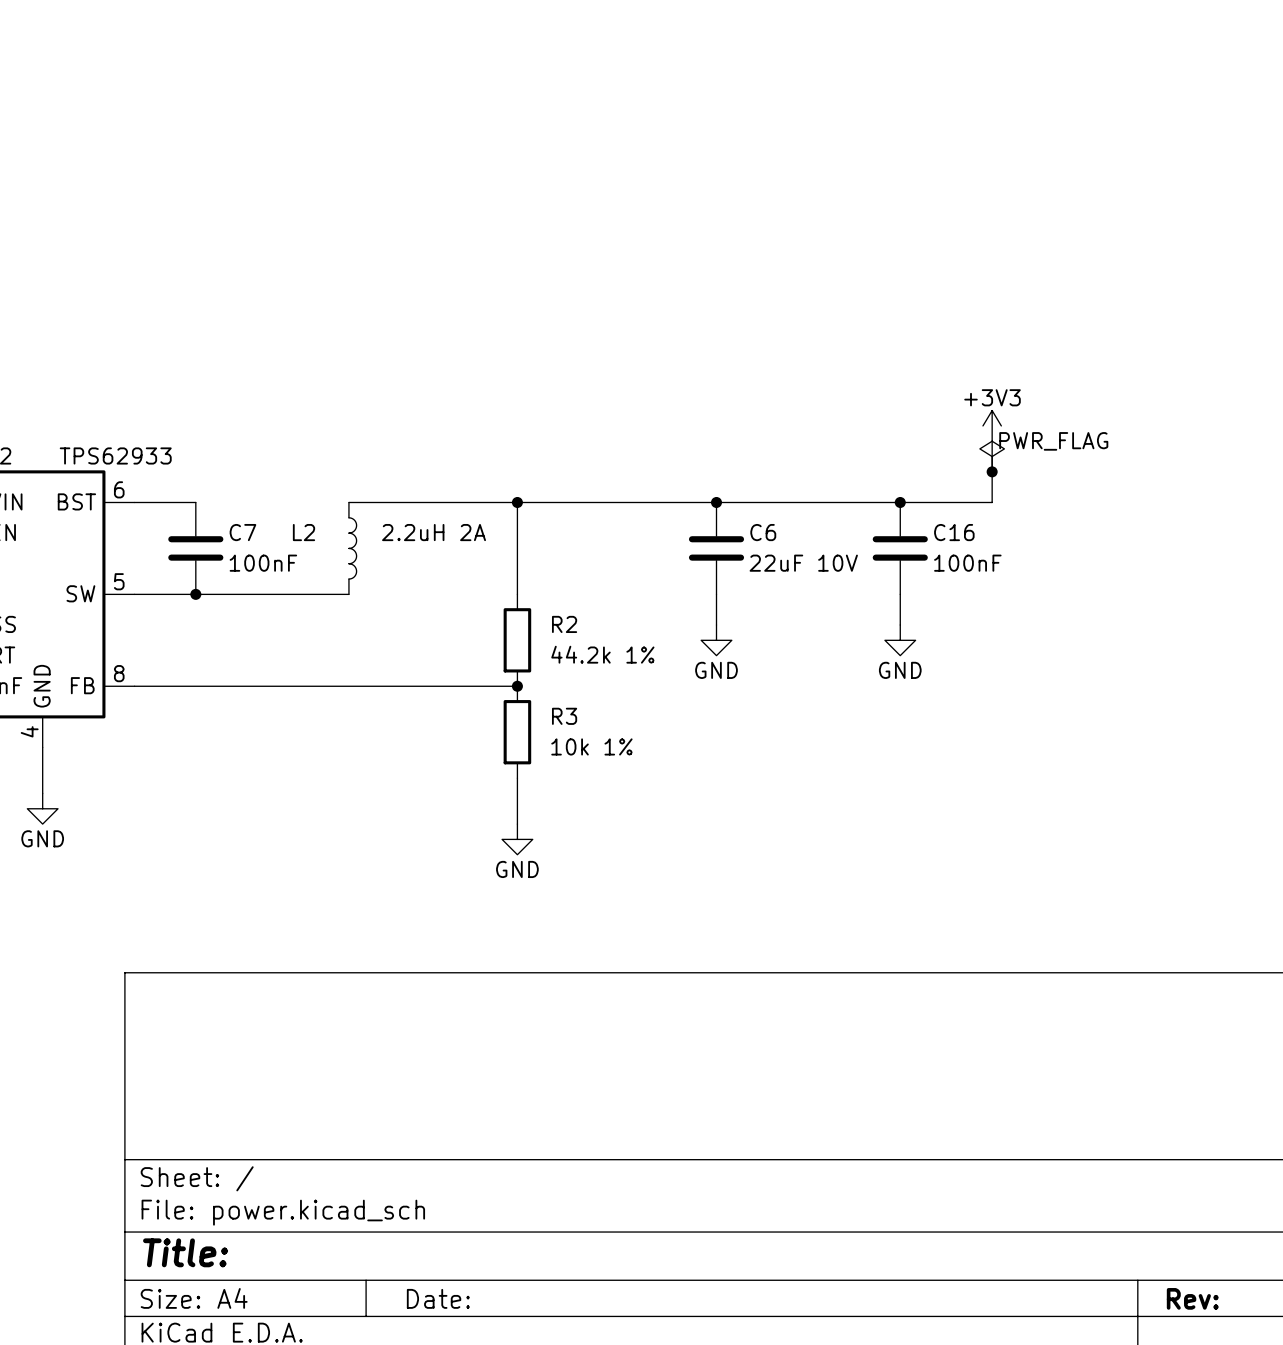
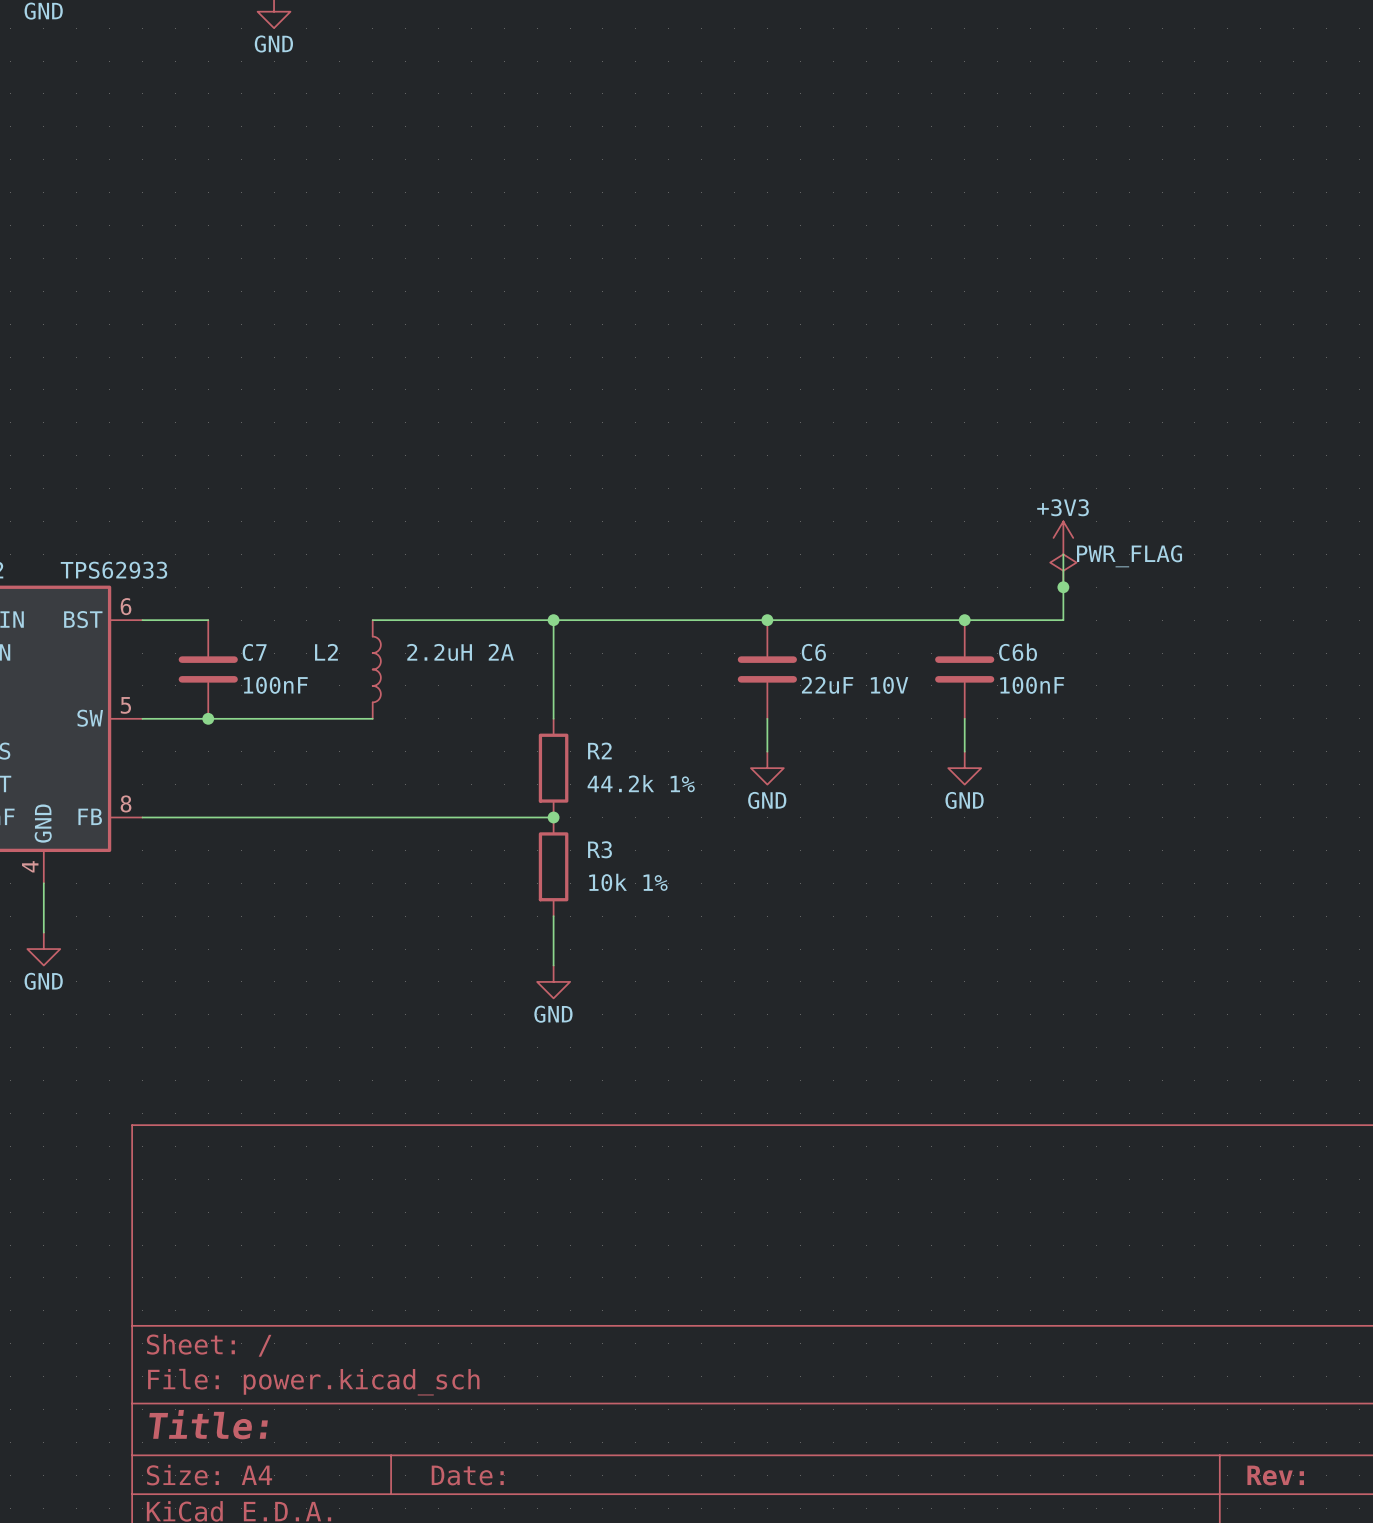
C16 name: C16 (954, 532) -> C6b (1018, 652)

